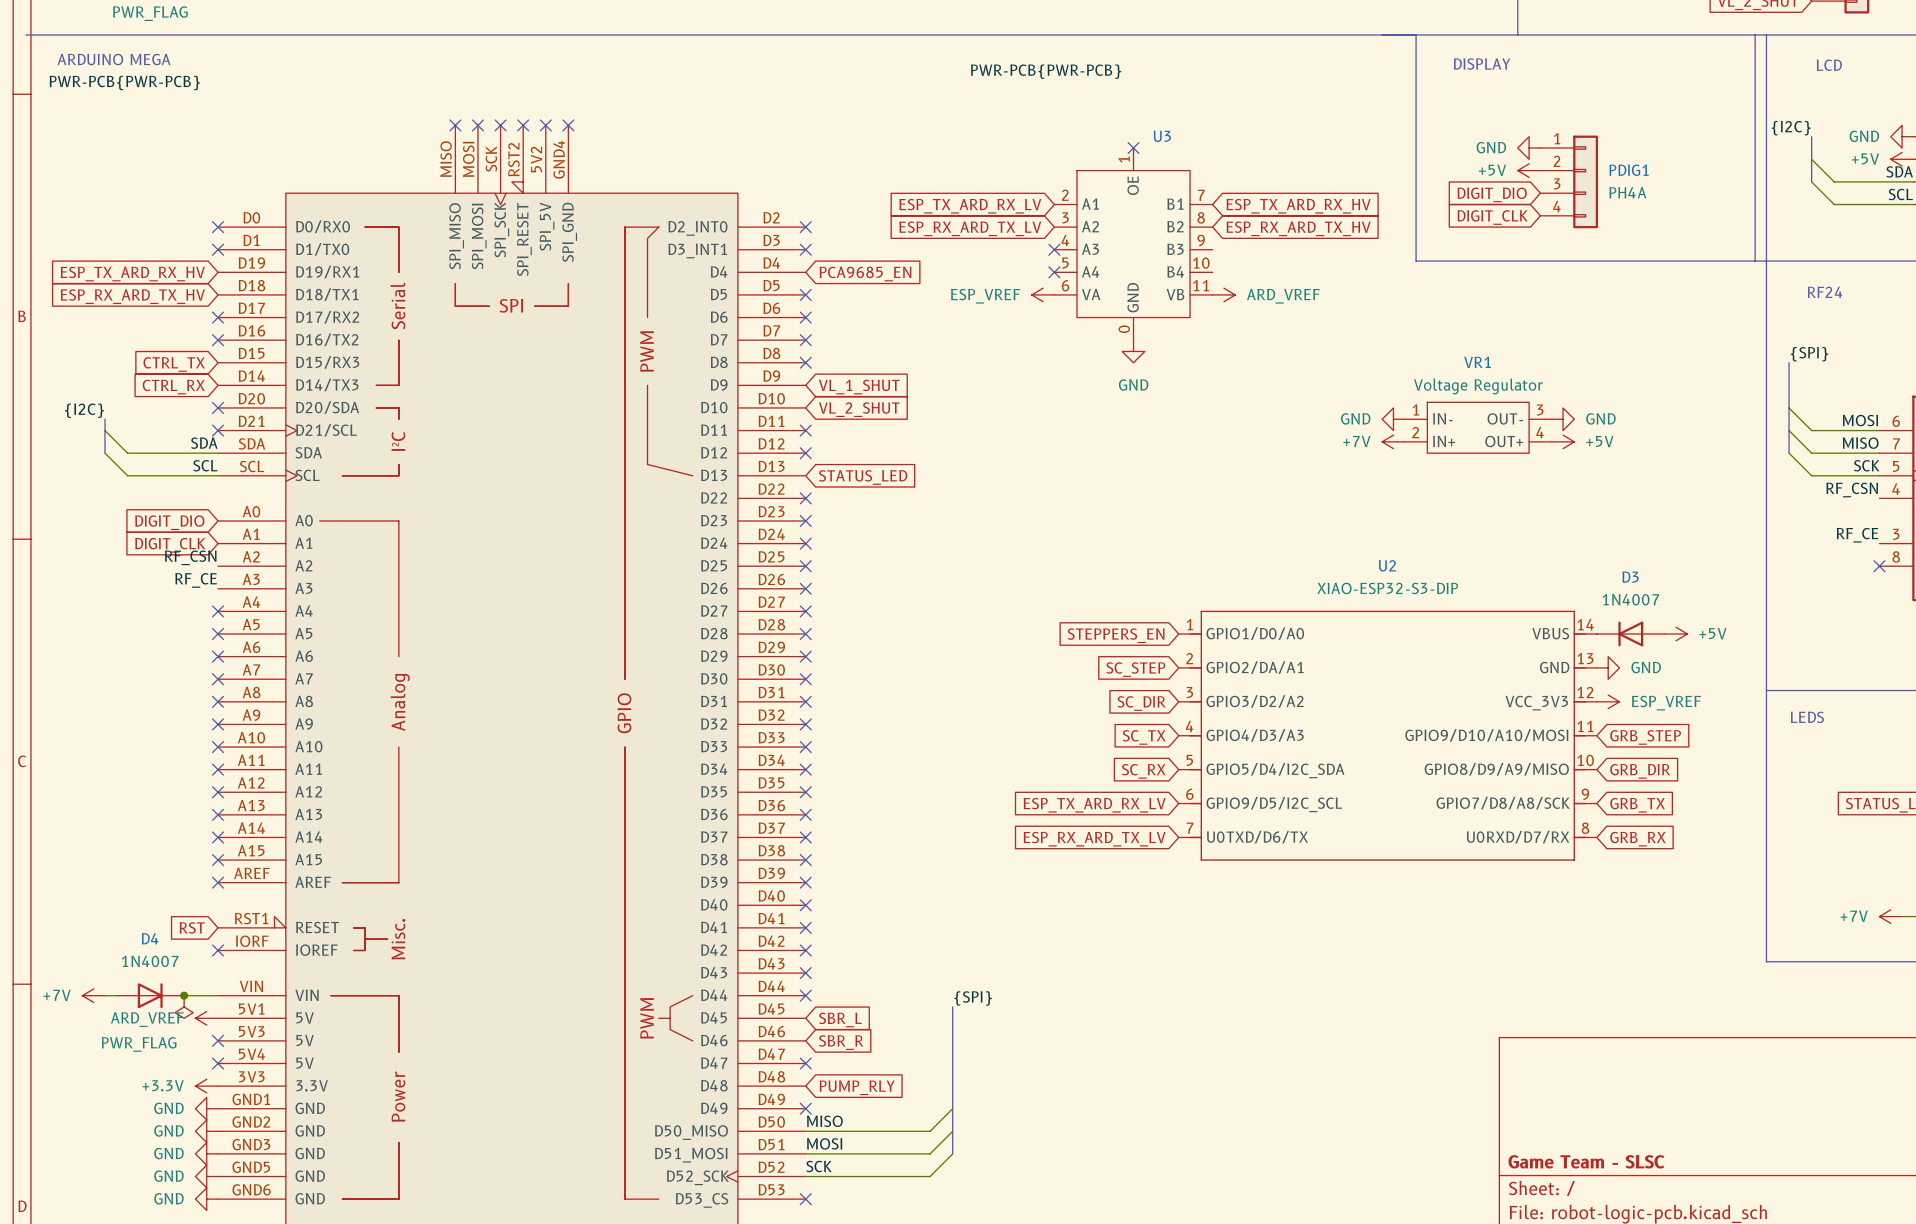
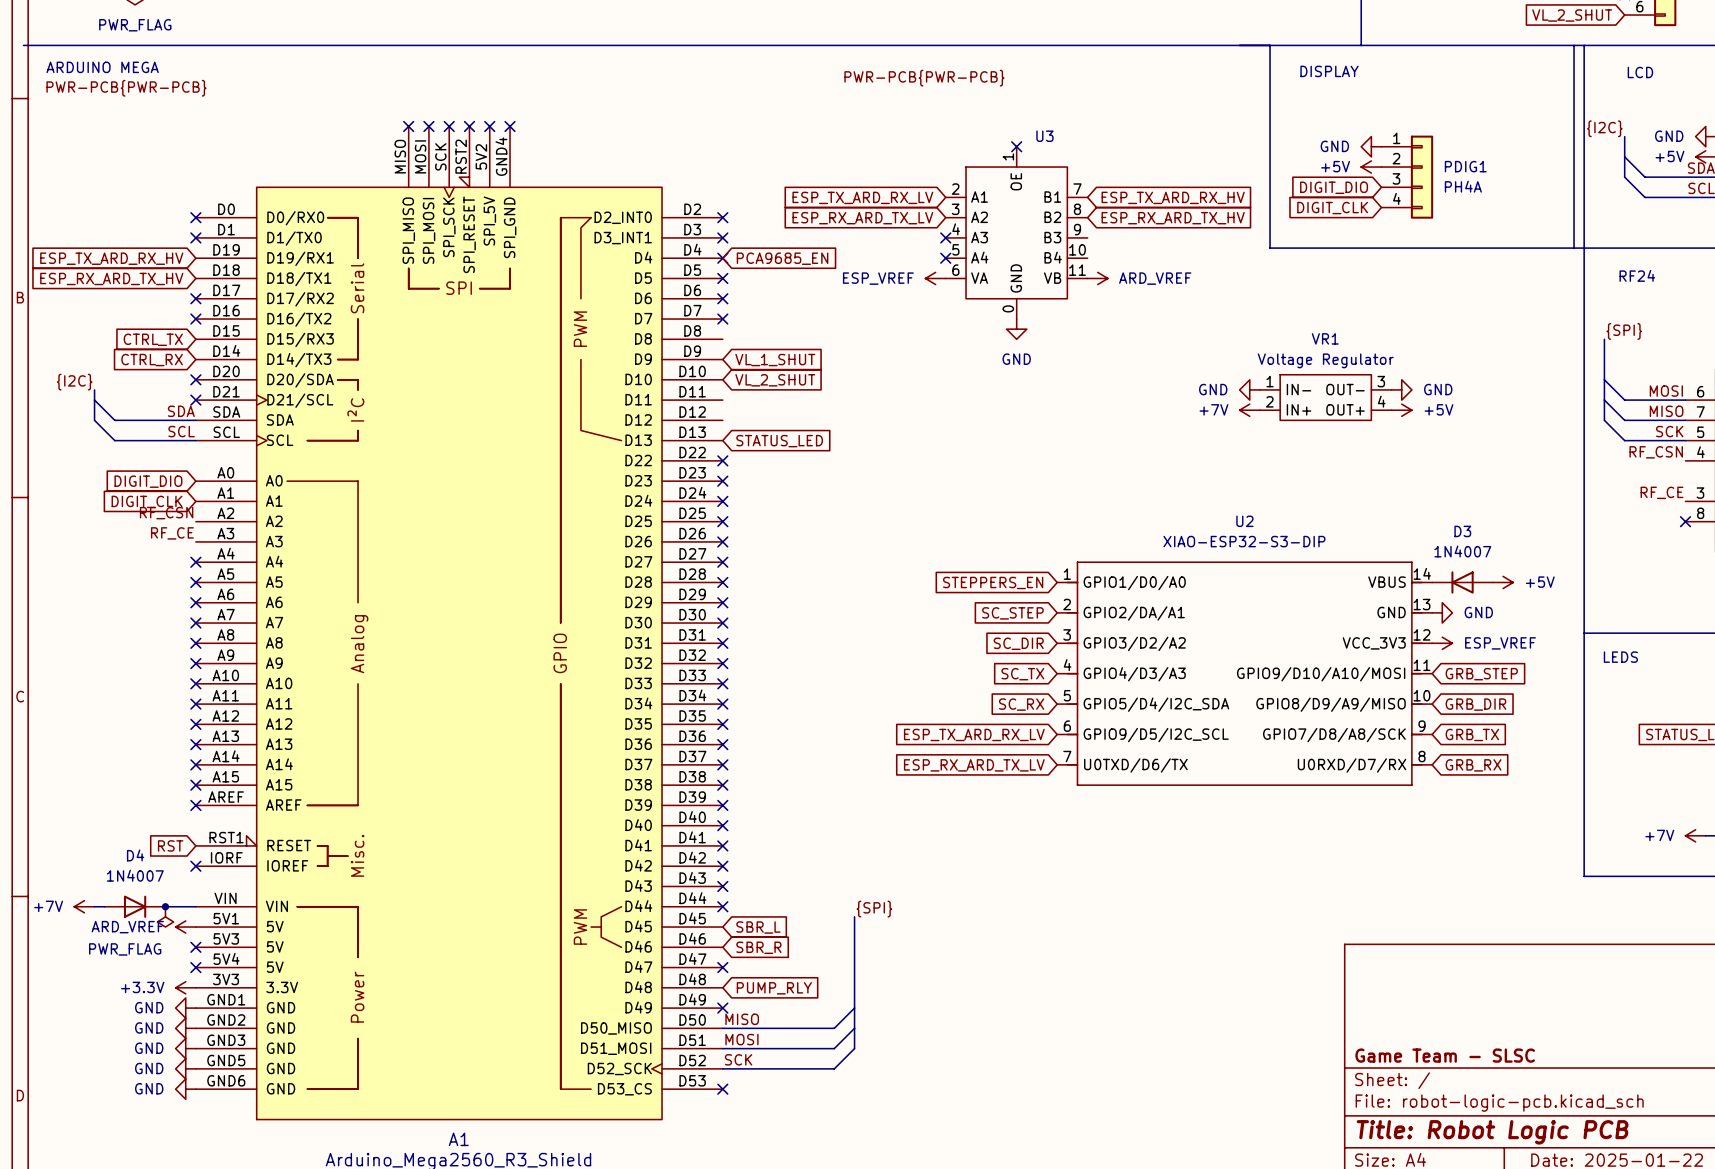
no-connect mark: none -> (722, 258)
no-connect mark: (805, 362) -> none
no-connect mark: (805, 430) -> none
no-connect mark: (805, 453) -> none

